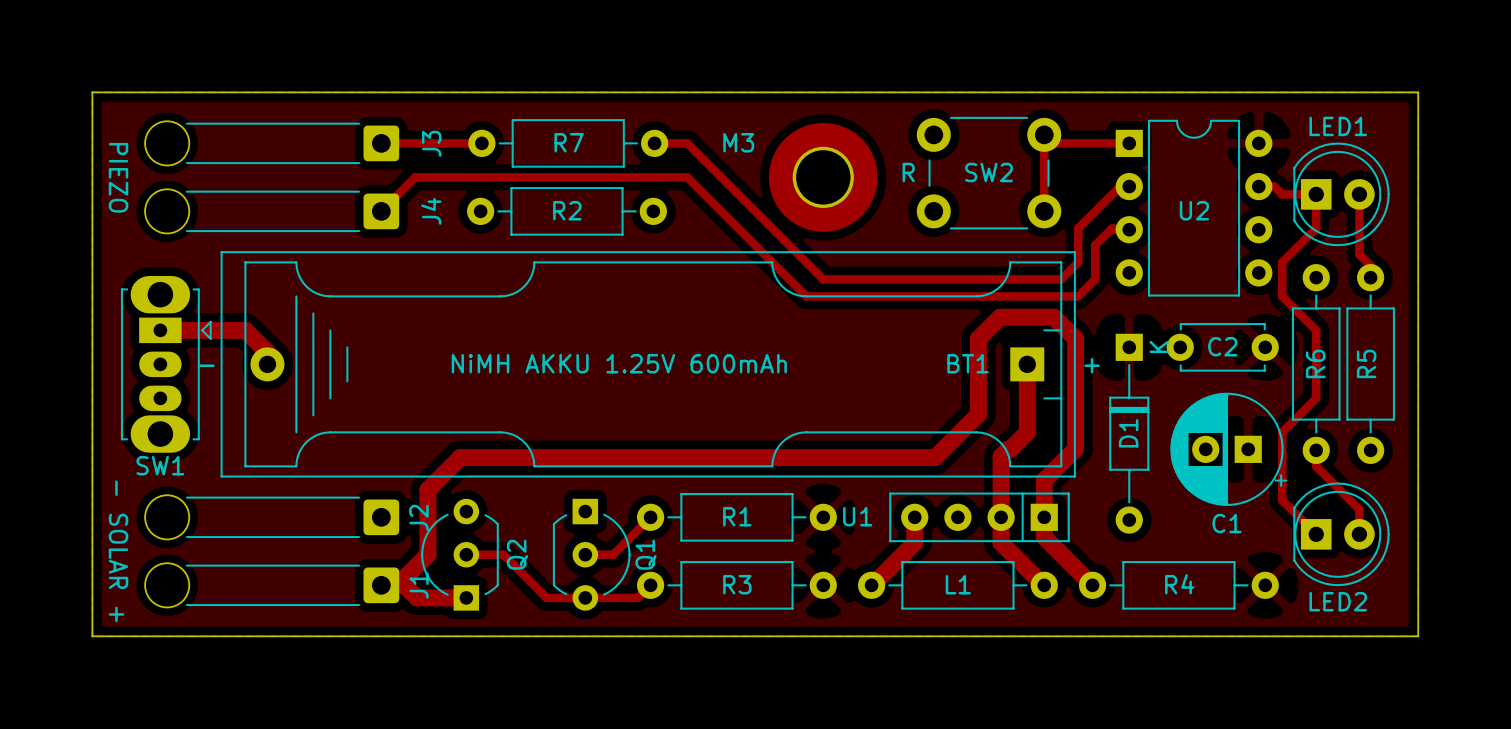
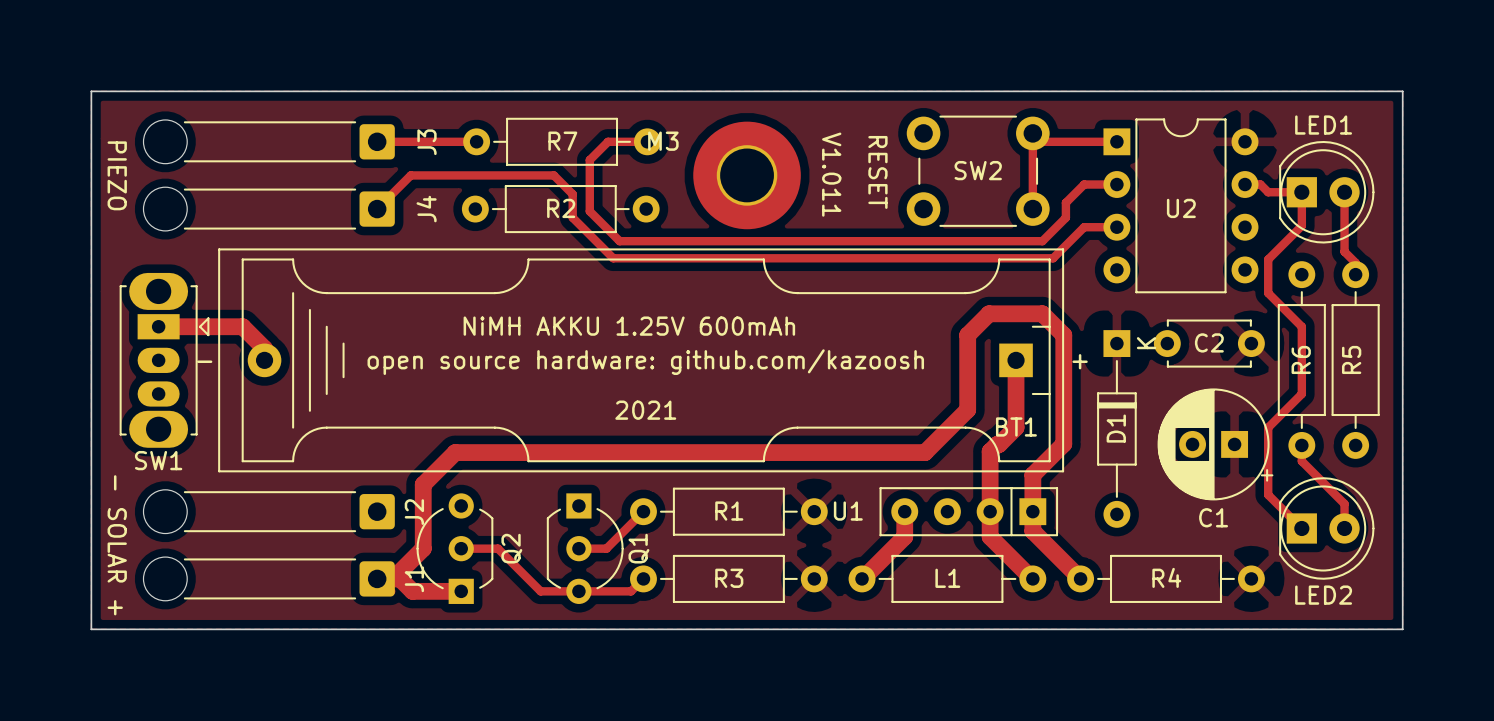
track: (654, 143) (687, 143) (823, 279) (1061, 279) (1078, 262) (1078, 228) (1120, 186) -> (647, 141) (608, 141) (589, 160) (589, 211) (619, 241) (1042, 241) (1065, 217) (1065, 202) (1084, 184) (1107, 184)
text: R (908, 172) -> none
text: none -> RESET (877, 172)
text: none -> V1.011 (831, 174)
track: (560, 177) (687, 177) (806, 296) (1078, 296) (1095, 279) (1095, 245) (1112, 228) (1113, 229) -> (553, 175) (572, 194) (572, 217) (613, 258) (1053, 258) (1084, 227) (1101, 227)
M3 position: (823, 177) -> (747, 175)
text position: NiMH AKKU 1.25V 600mAh (619, 363) -> NiMH AKKU 1.25V 600mAh (629, 326)
BT1 name position: BT1 (968, 363) -> BT1 (1016, 426)
text: none -> open source hardware: github.com/kazoosh (645, 362)
text: none -> 2021 (645, 410)

